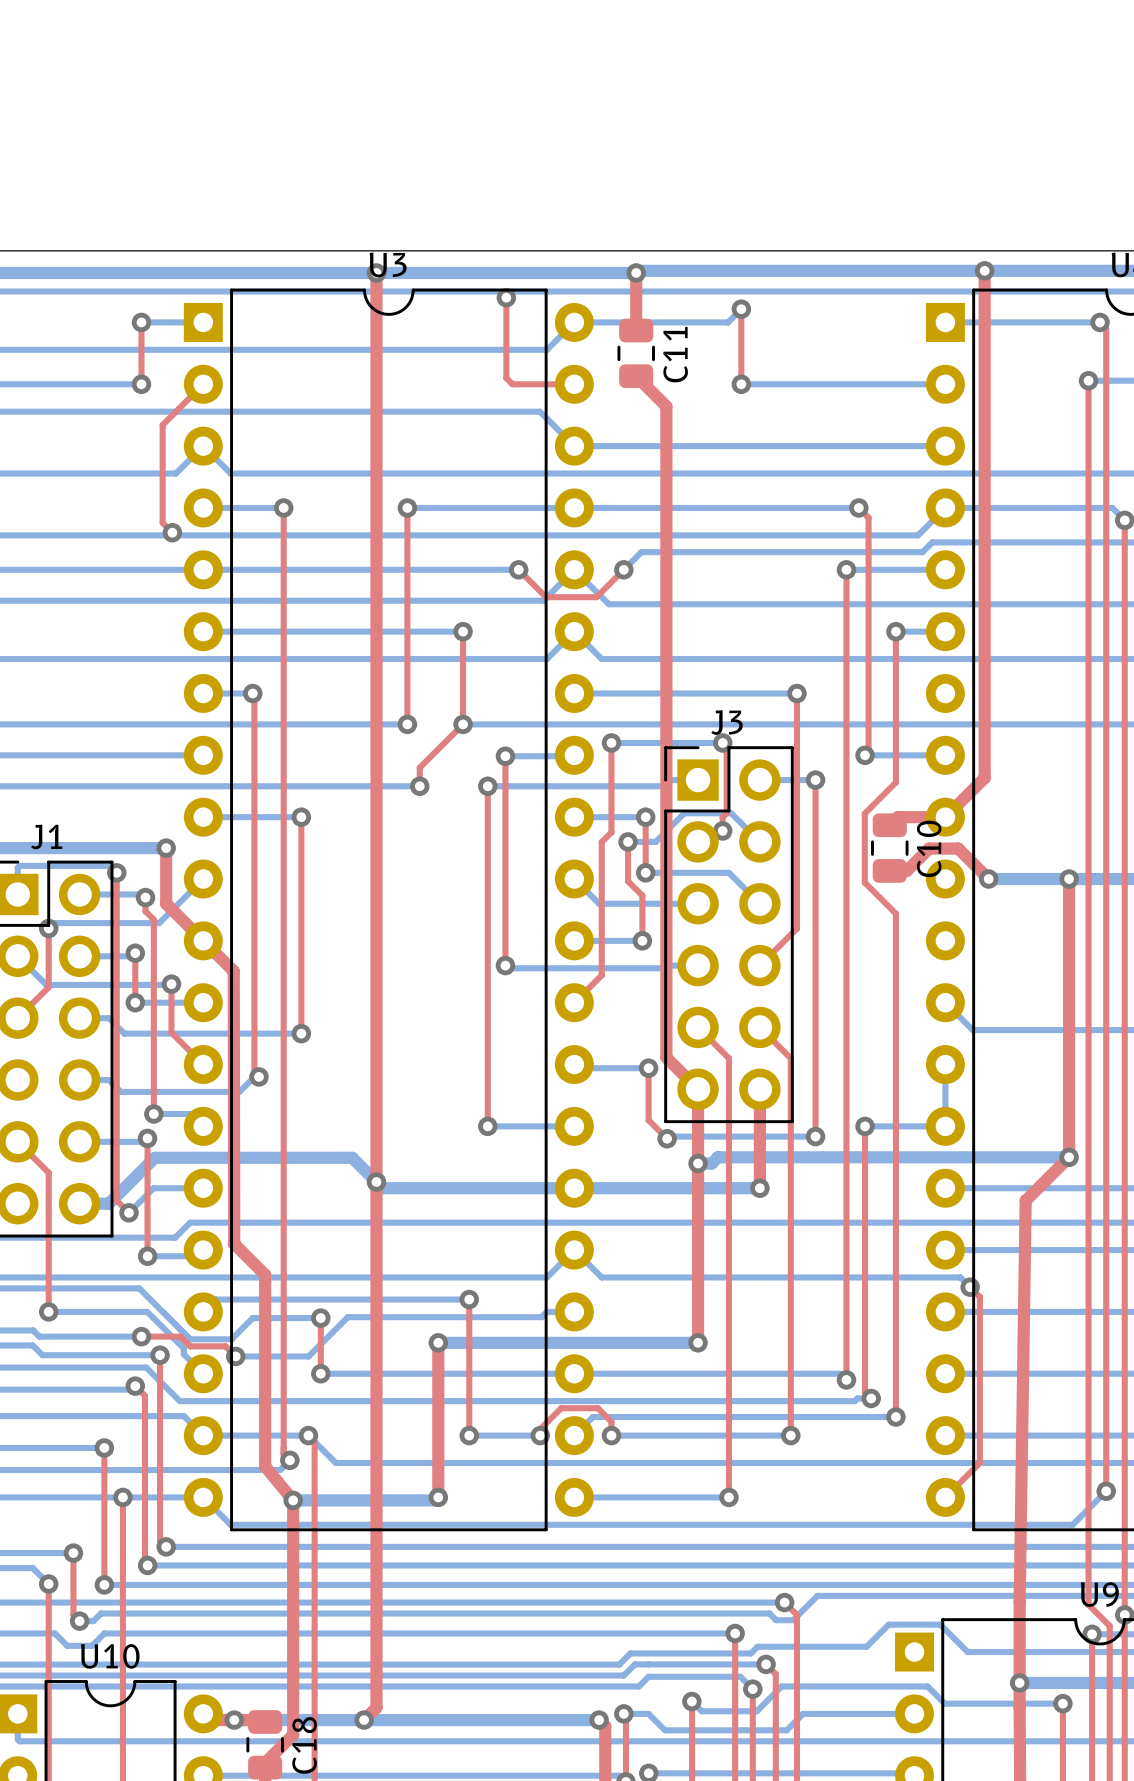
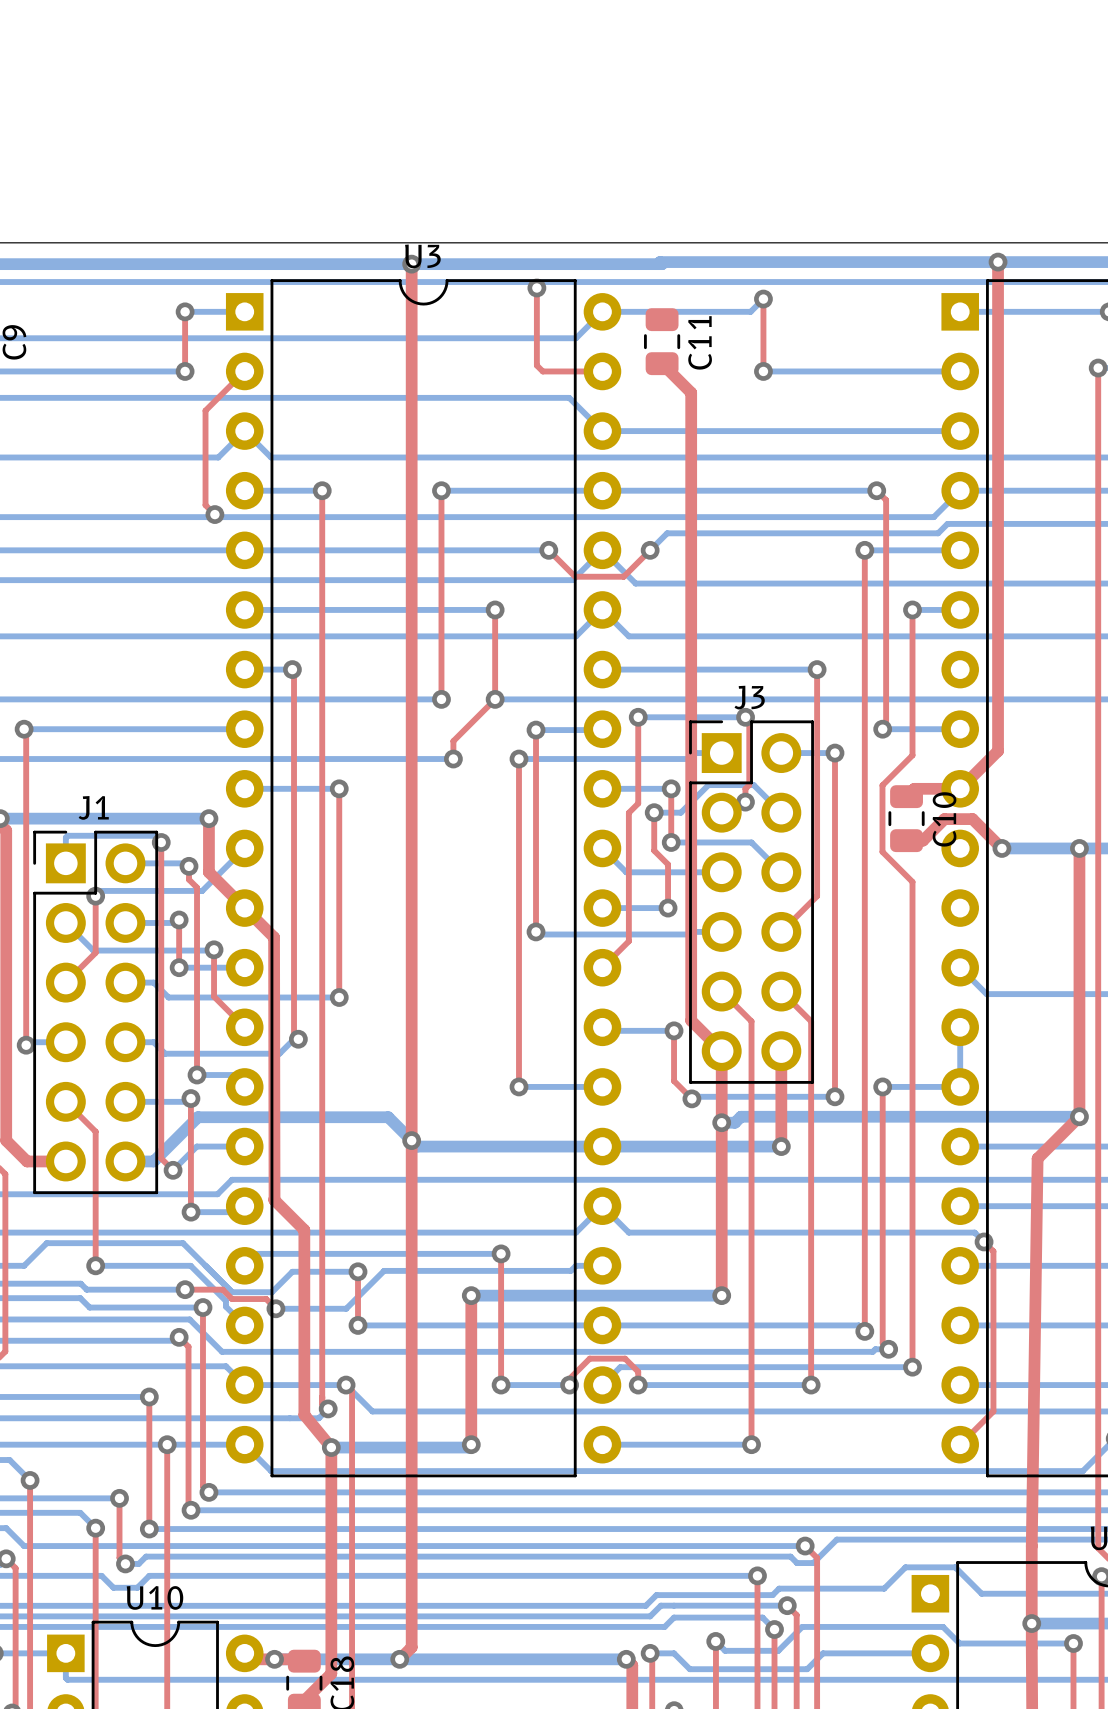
top track: (636, 272) (636, 330) -> none
via: (636, 272) -> none

